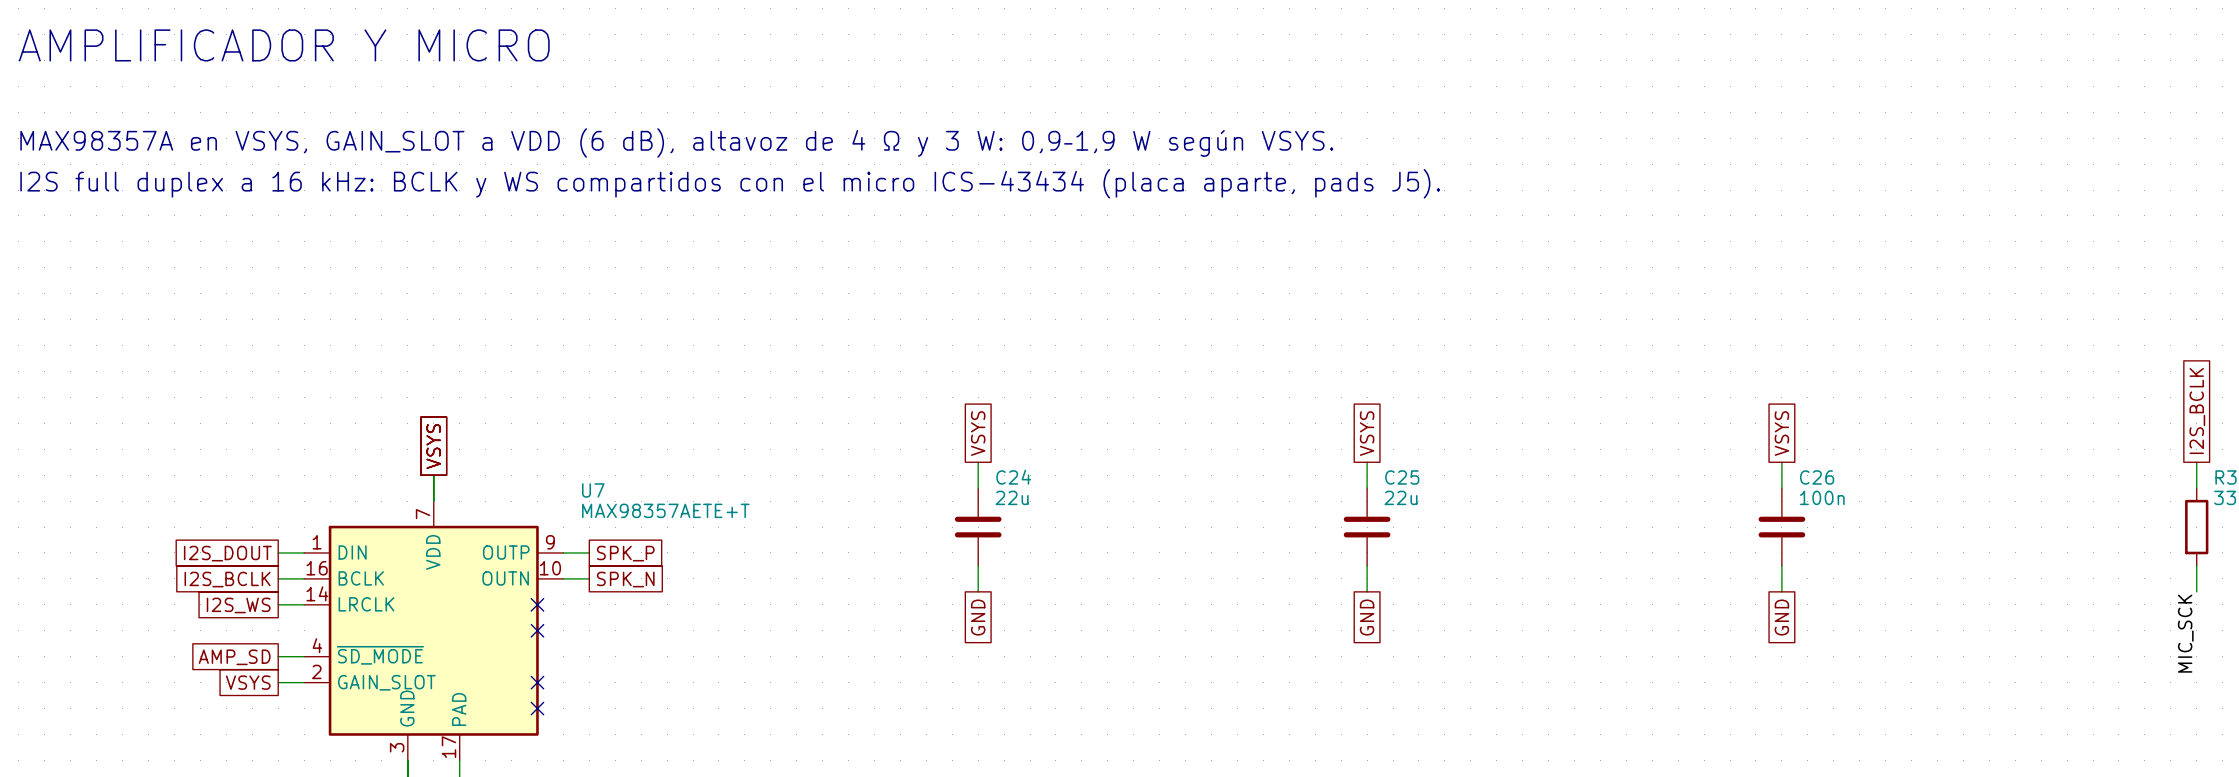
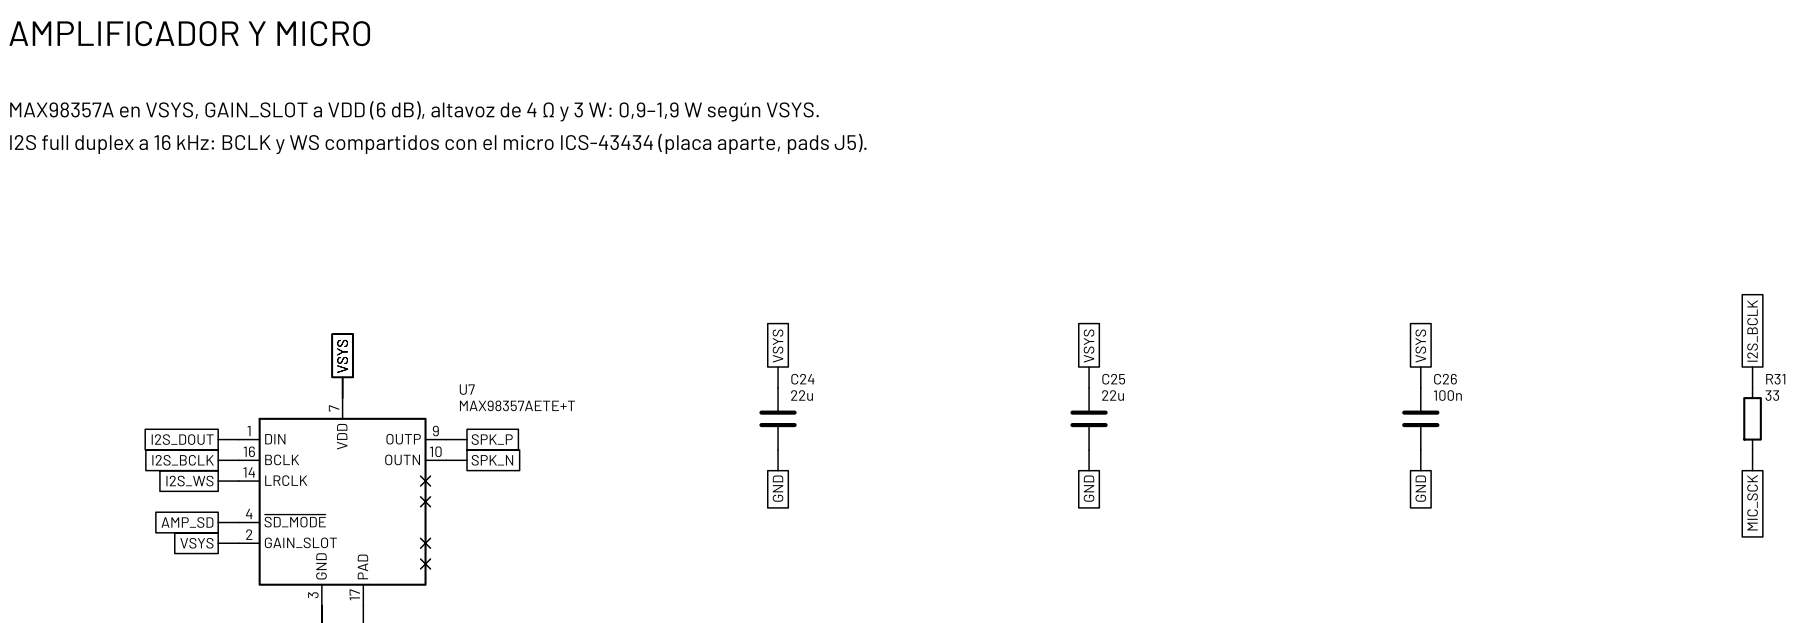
label: MIC_SCK (2185, 633) -> none
global label: none -> MIC_SCK (1752, 502)

